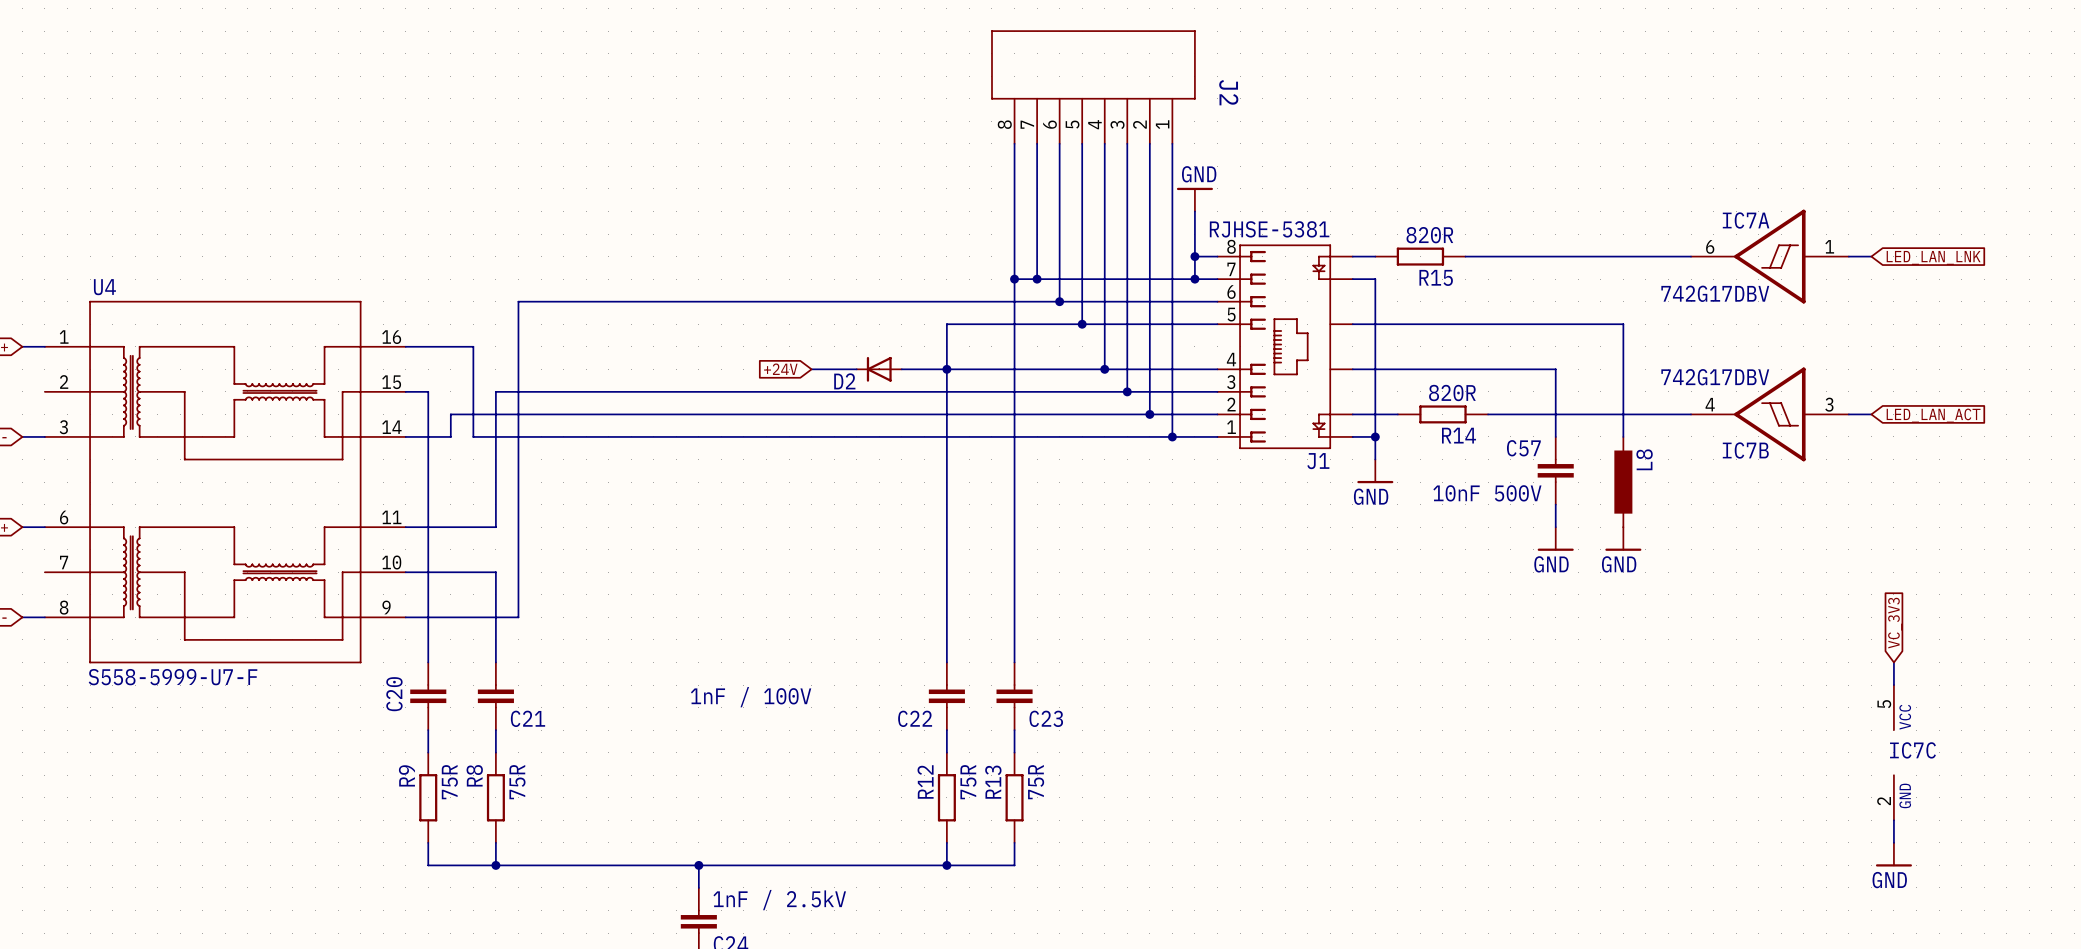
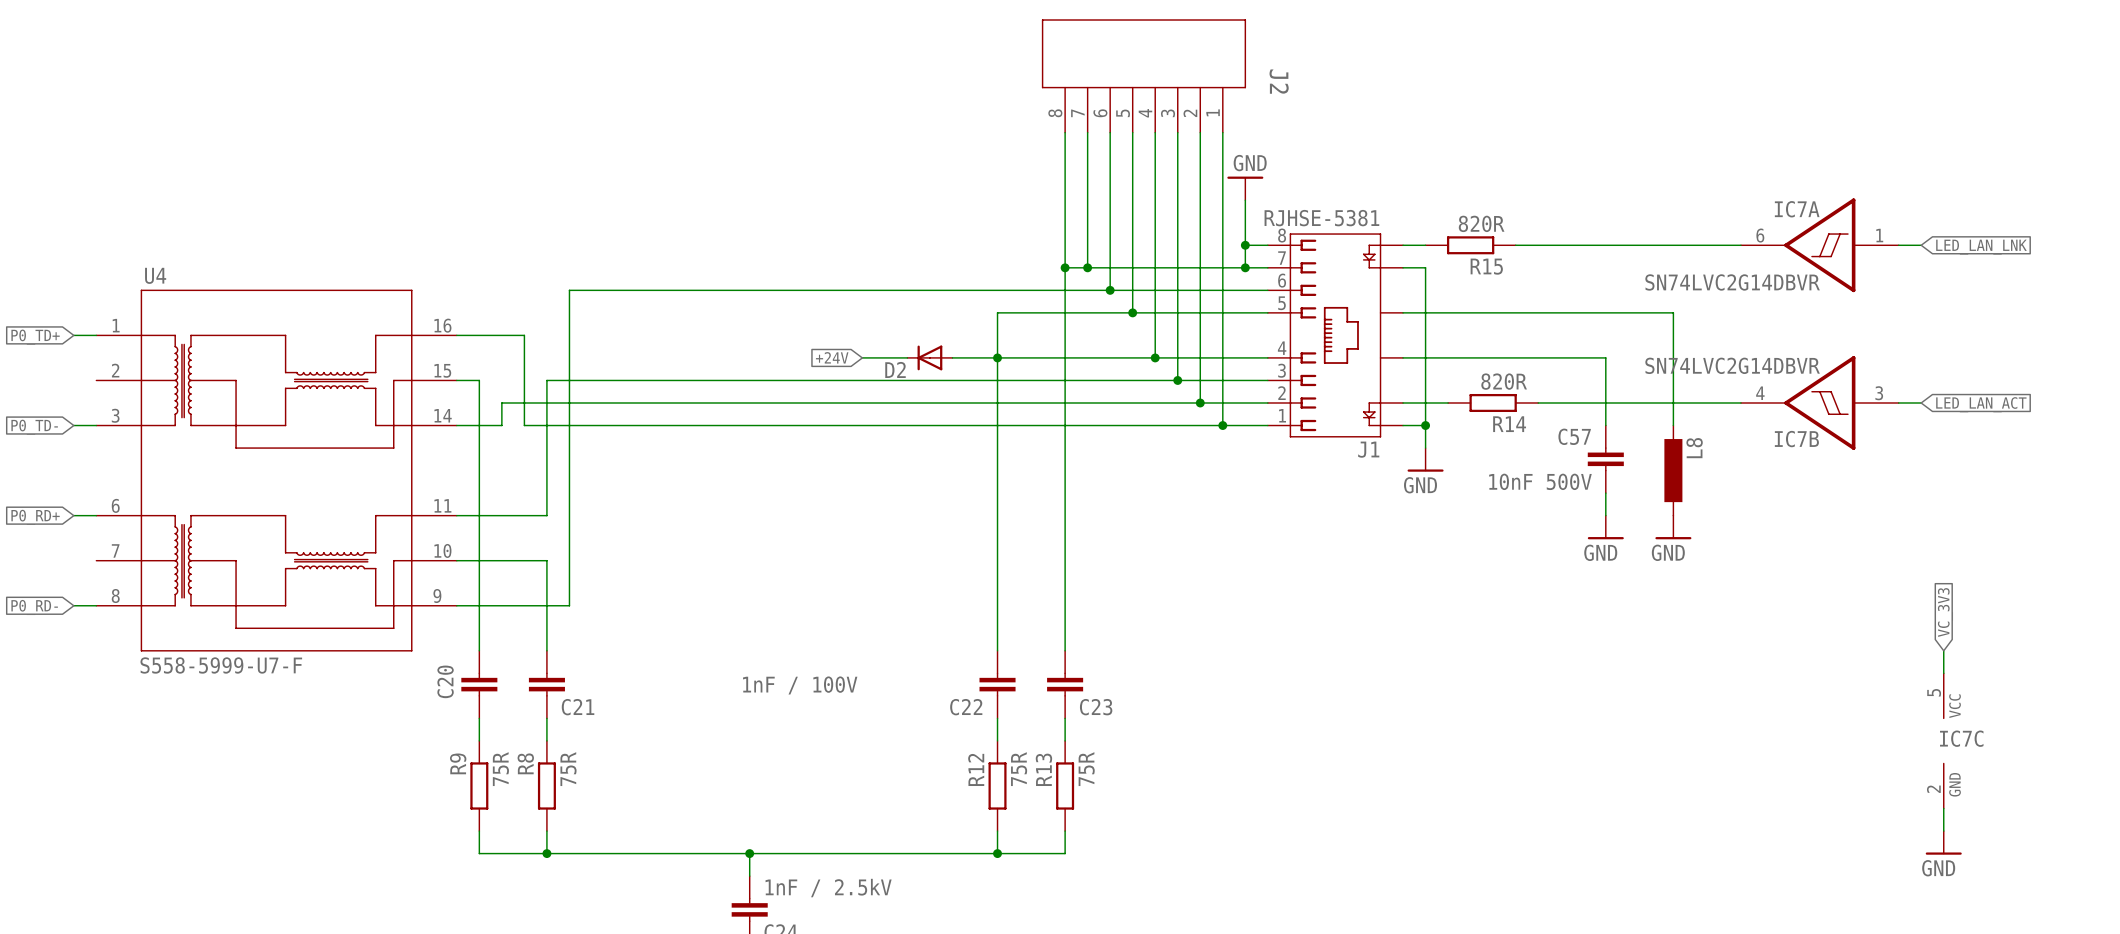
IC7A value: 742G17DBV (1715, 293) -> SN74LVC2G14DBVR (1732, 282)
IC7B value: 742G17DBV (1715, 377) -> SN74LVC2G14DBVR (1732, 365)

